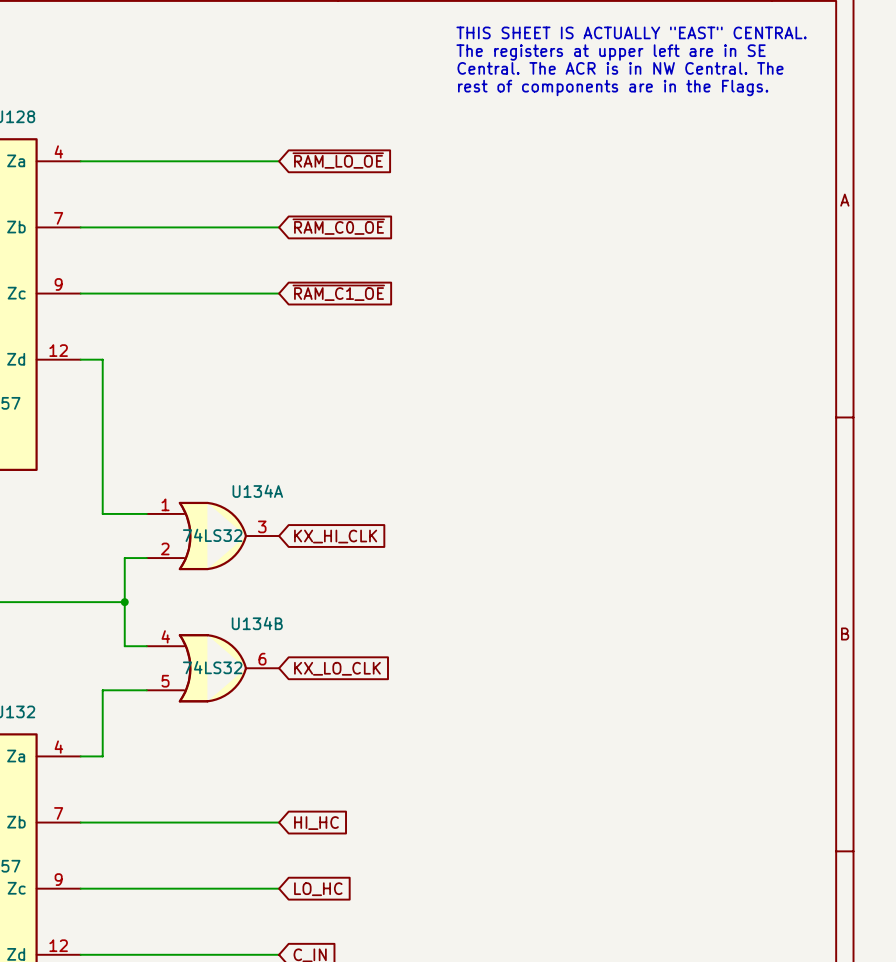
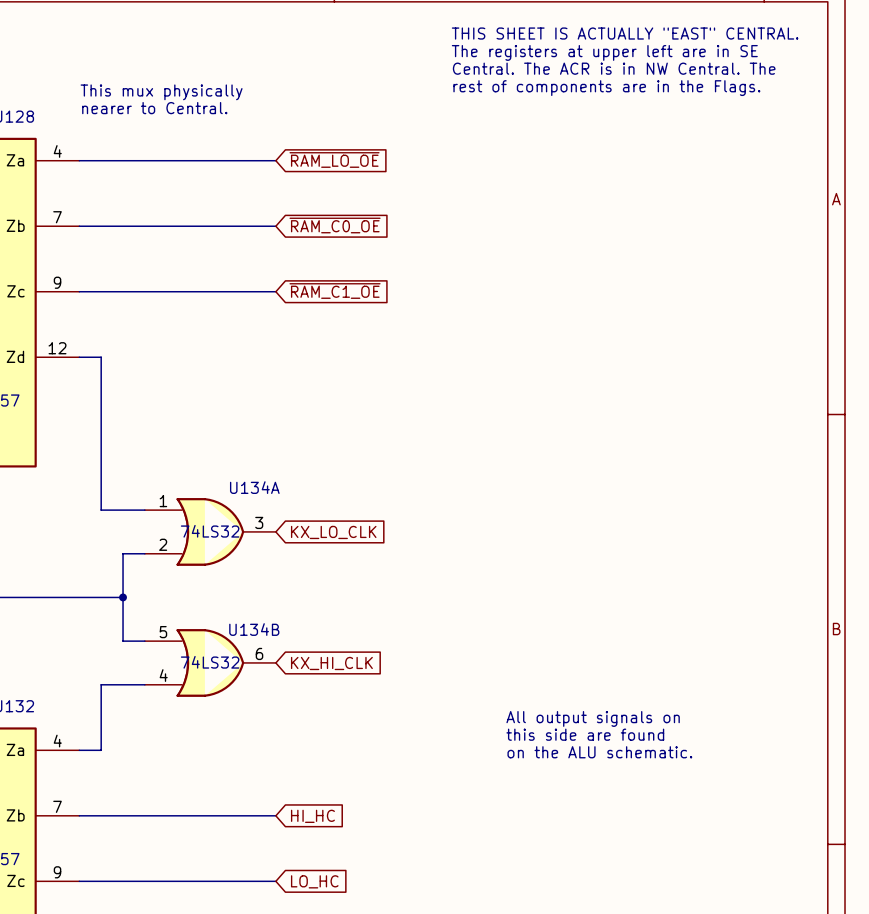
text: none -> This mux physically (161, 92)
text: none -> nearer to Central. (154, 108)
global label: KX_HI_CLK (335, 536) -> KX_LO_CLK (333, 532)
U134B flip: as is (212, 668) -> up-down (210, 662)
global label: KX_LO_CLK (337, 668) -> KX_HI_CLK (331, 663)
text: none -> All output signals on (593, 718)
text: none -> this side are found (585, 734)
text: none -> on the ALU schematic. (599, 752)

